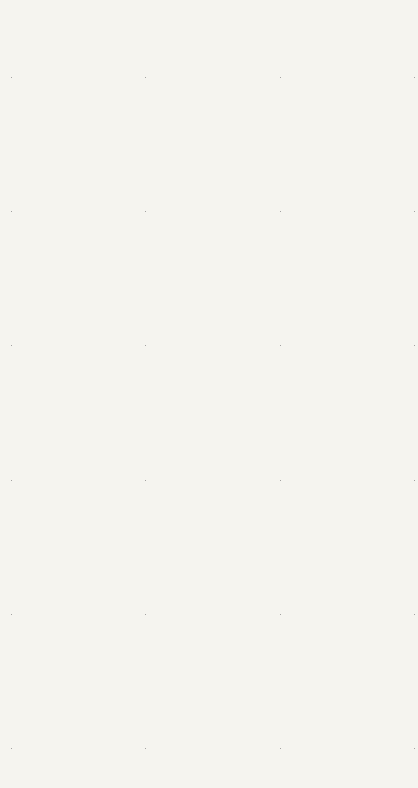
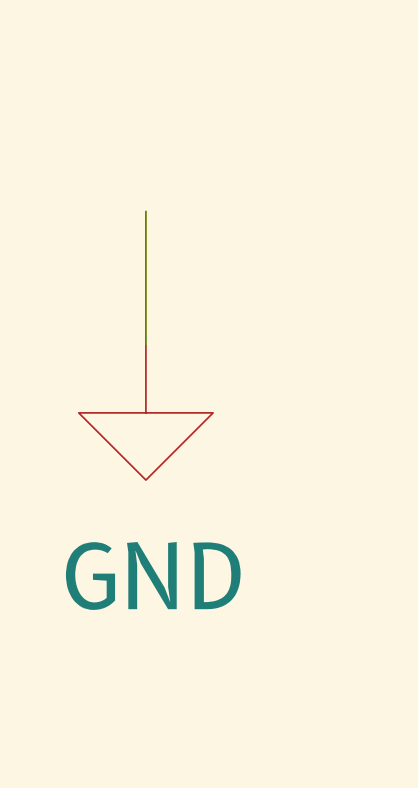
wire: none -> (145, 211) (145, 345)
power symbol: none -> GND (145, 412)

